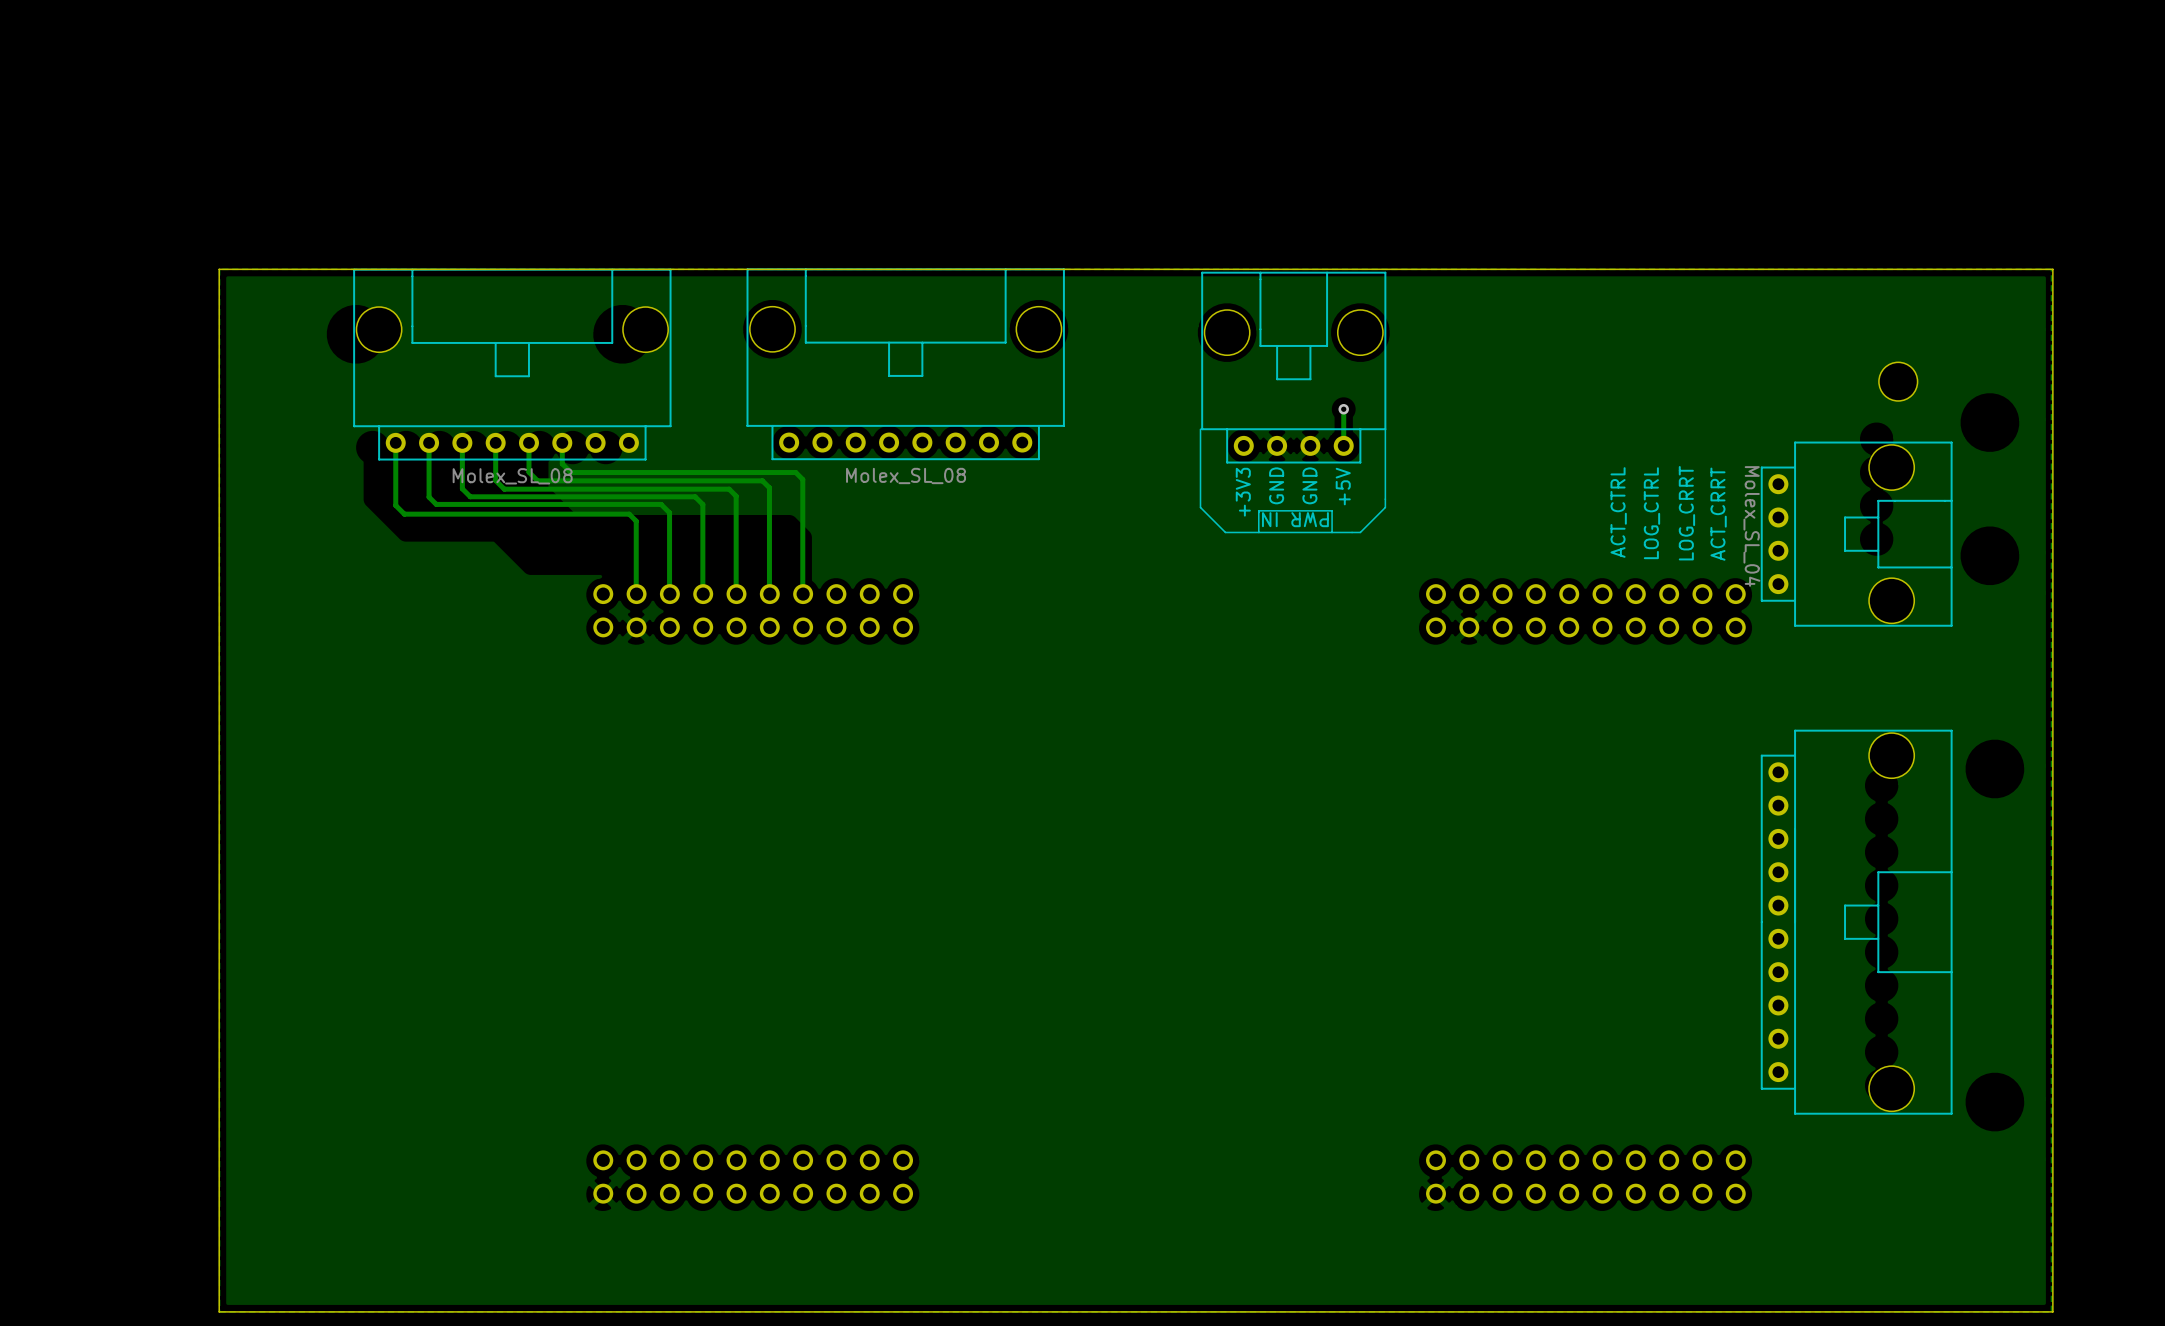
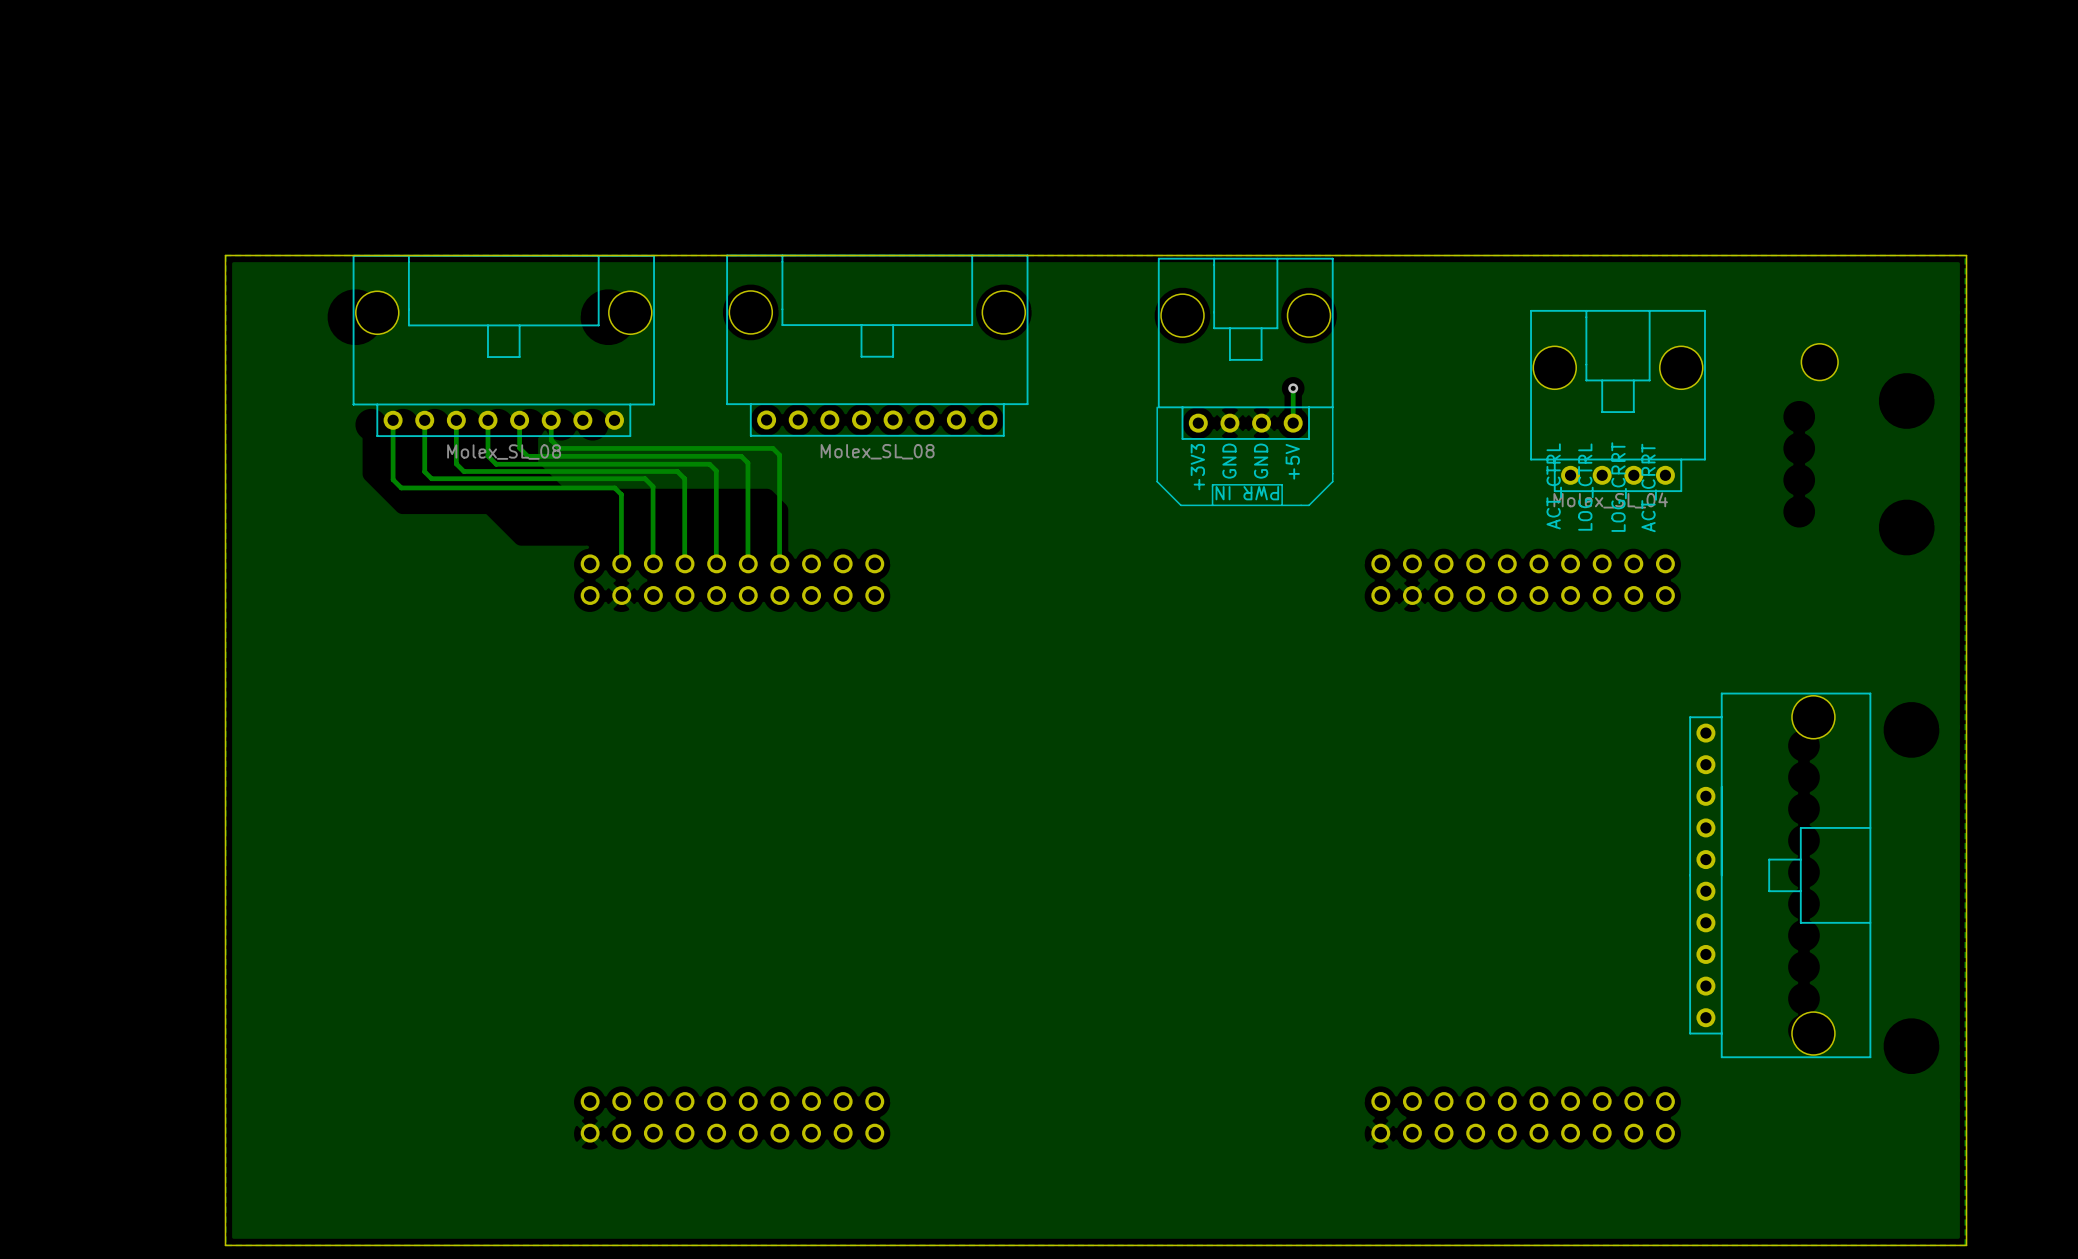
part rotation: 0° (1856, 534) -> 90° counterclockwise (1618, 401)
part position: (1856, 534) -> (1618, 401)

